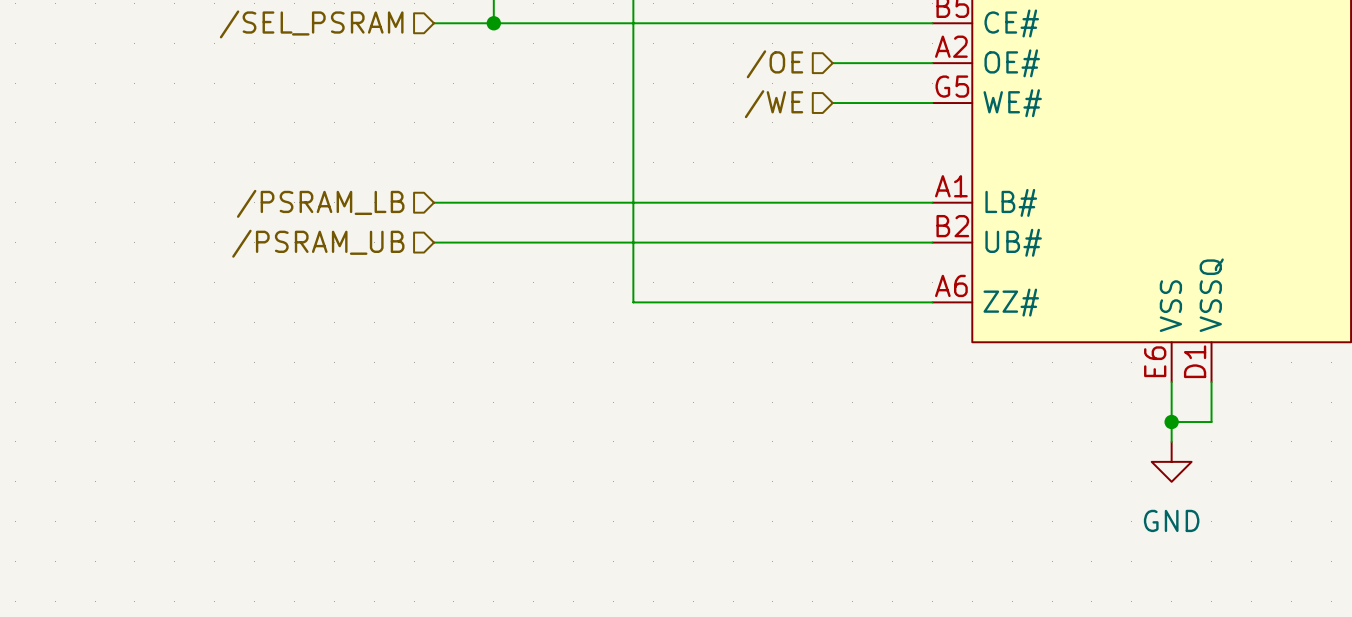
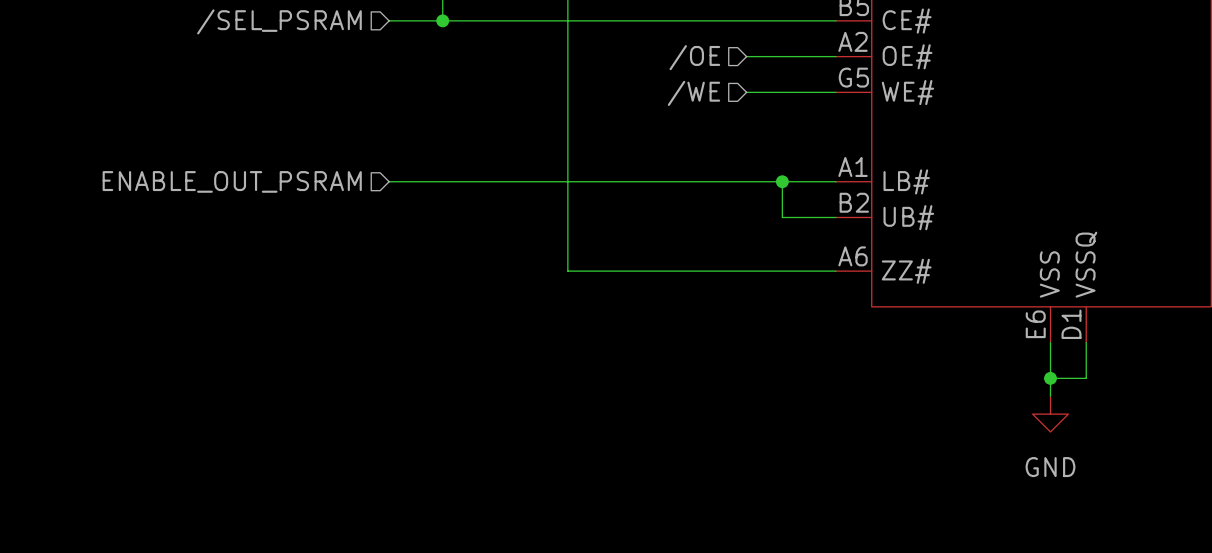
junction: none -> (782, 181)
hierarchical label: /PSRAM_LB (320, 203) -> ENABLE_OUT_PSRAM (232, 181)
wire: (433, 242) (872, 242) -> (782, 181) (782, 217)
hierarchical label: /PSRAM_UB (318, 243) -> none

